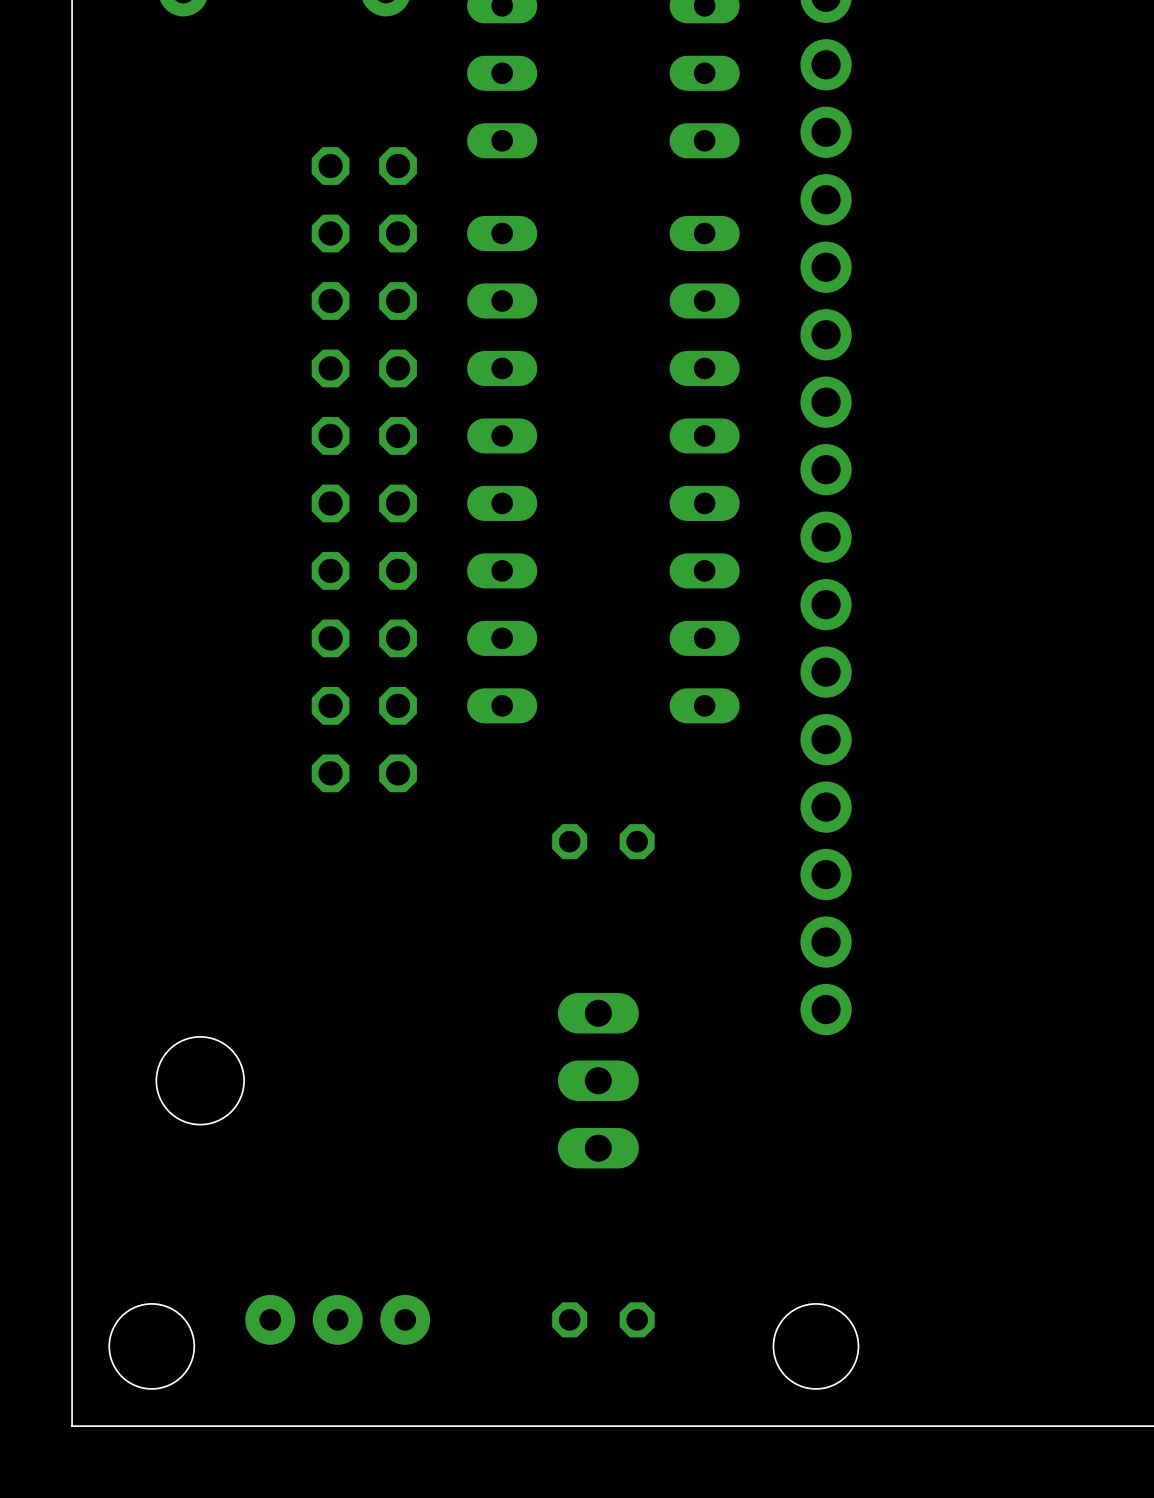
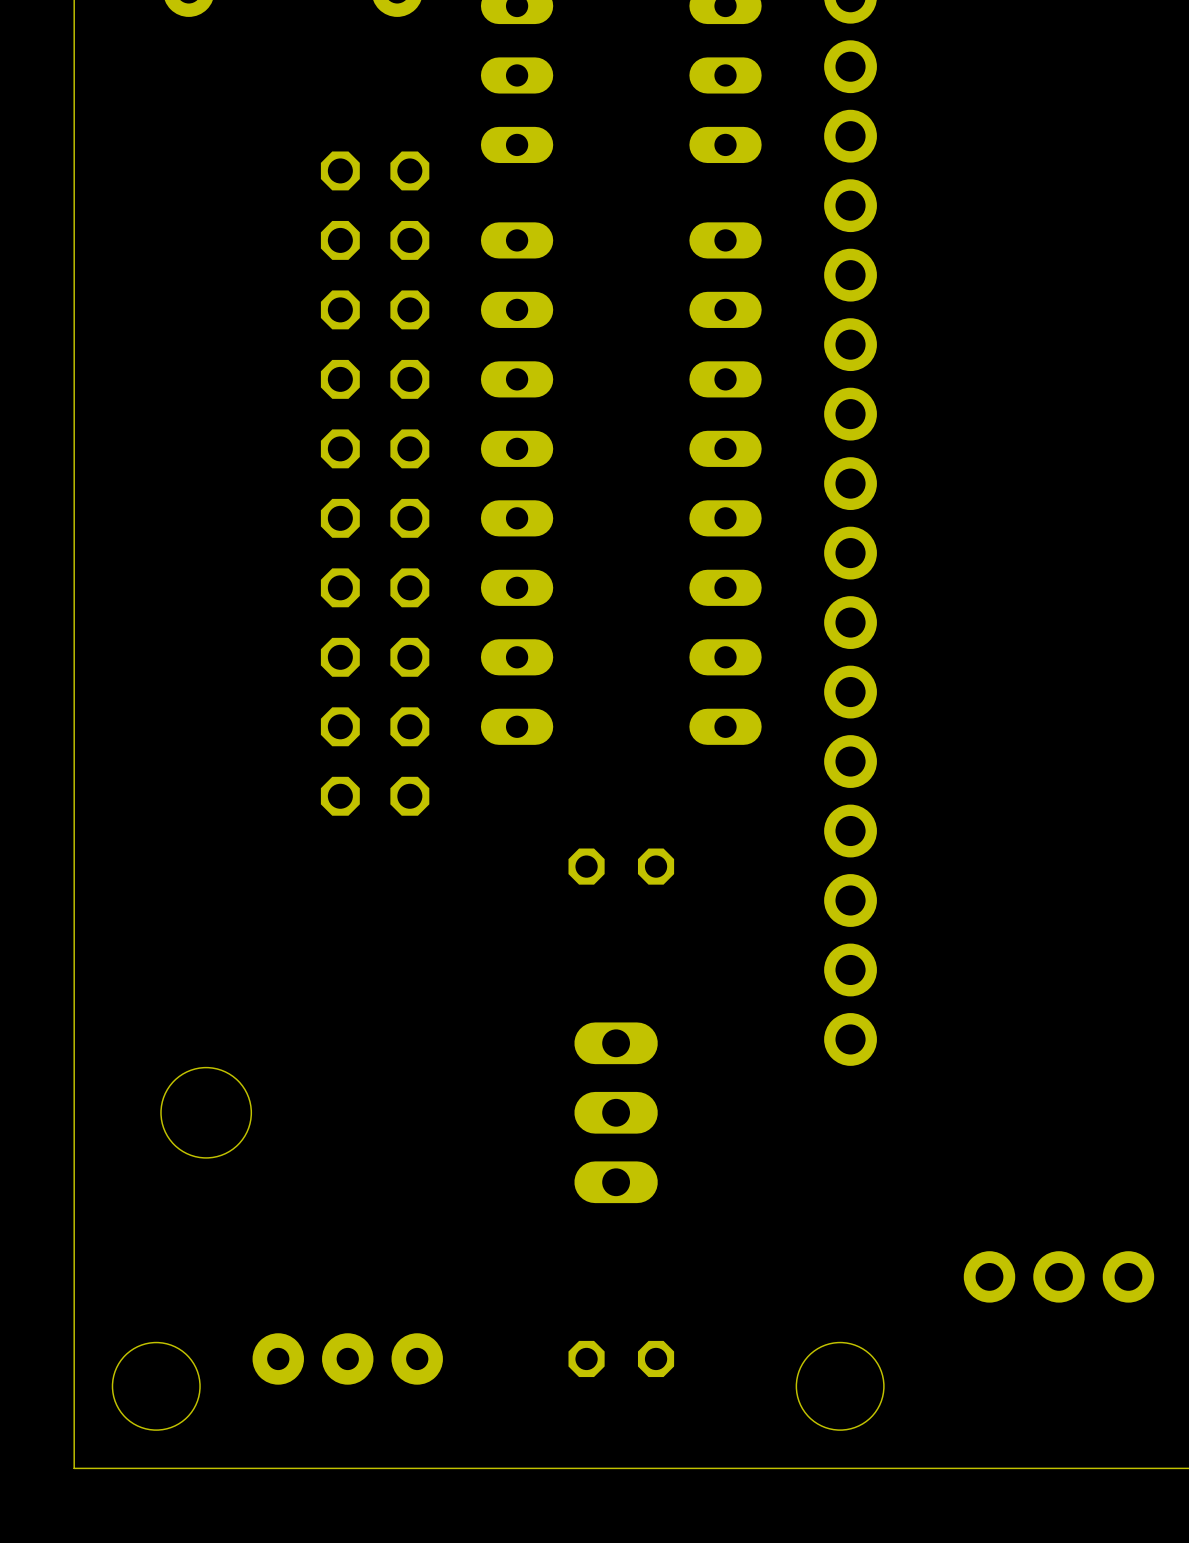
part: none -> (1058, 1276)

